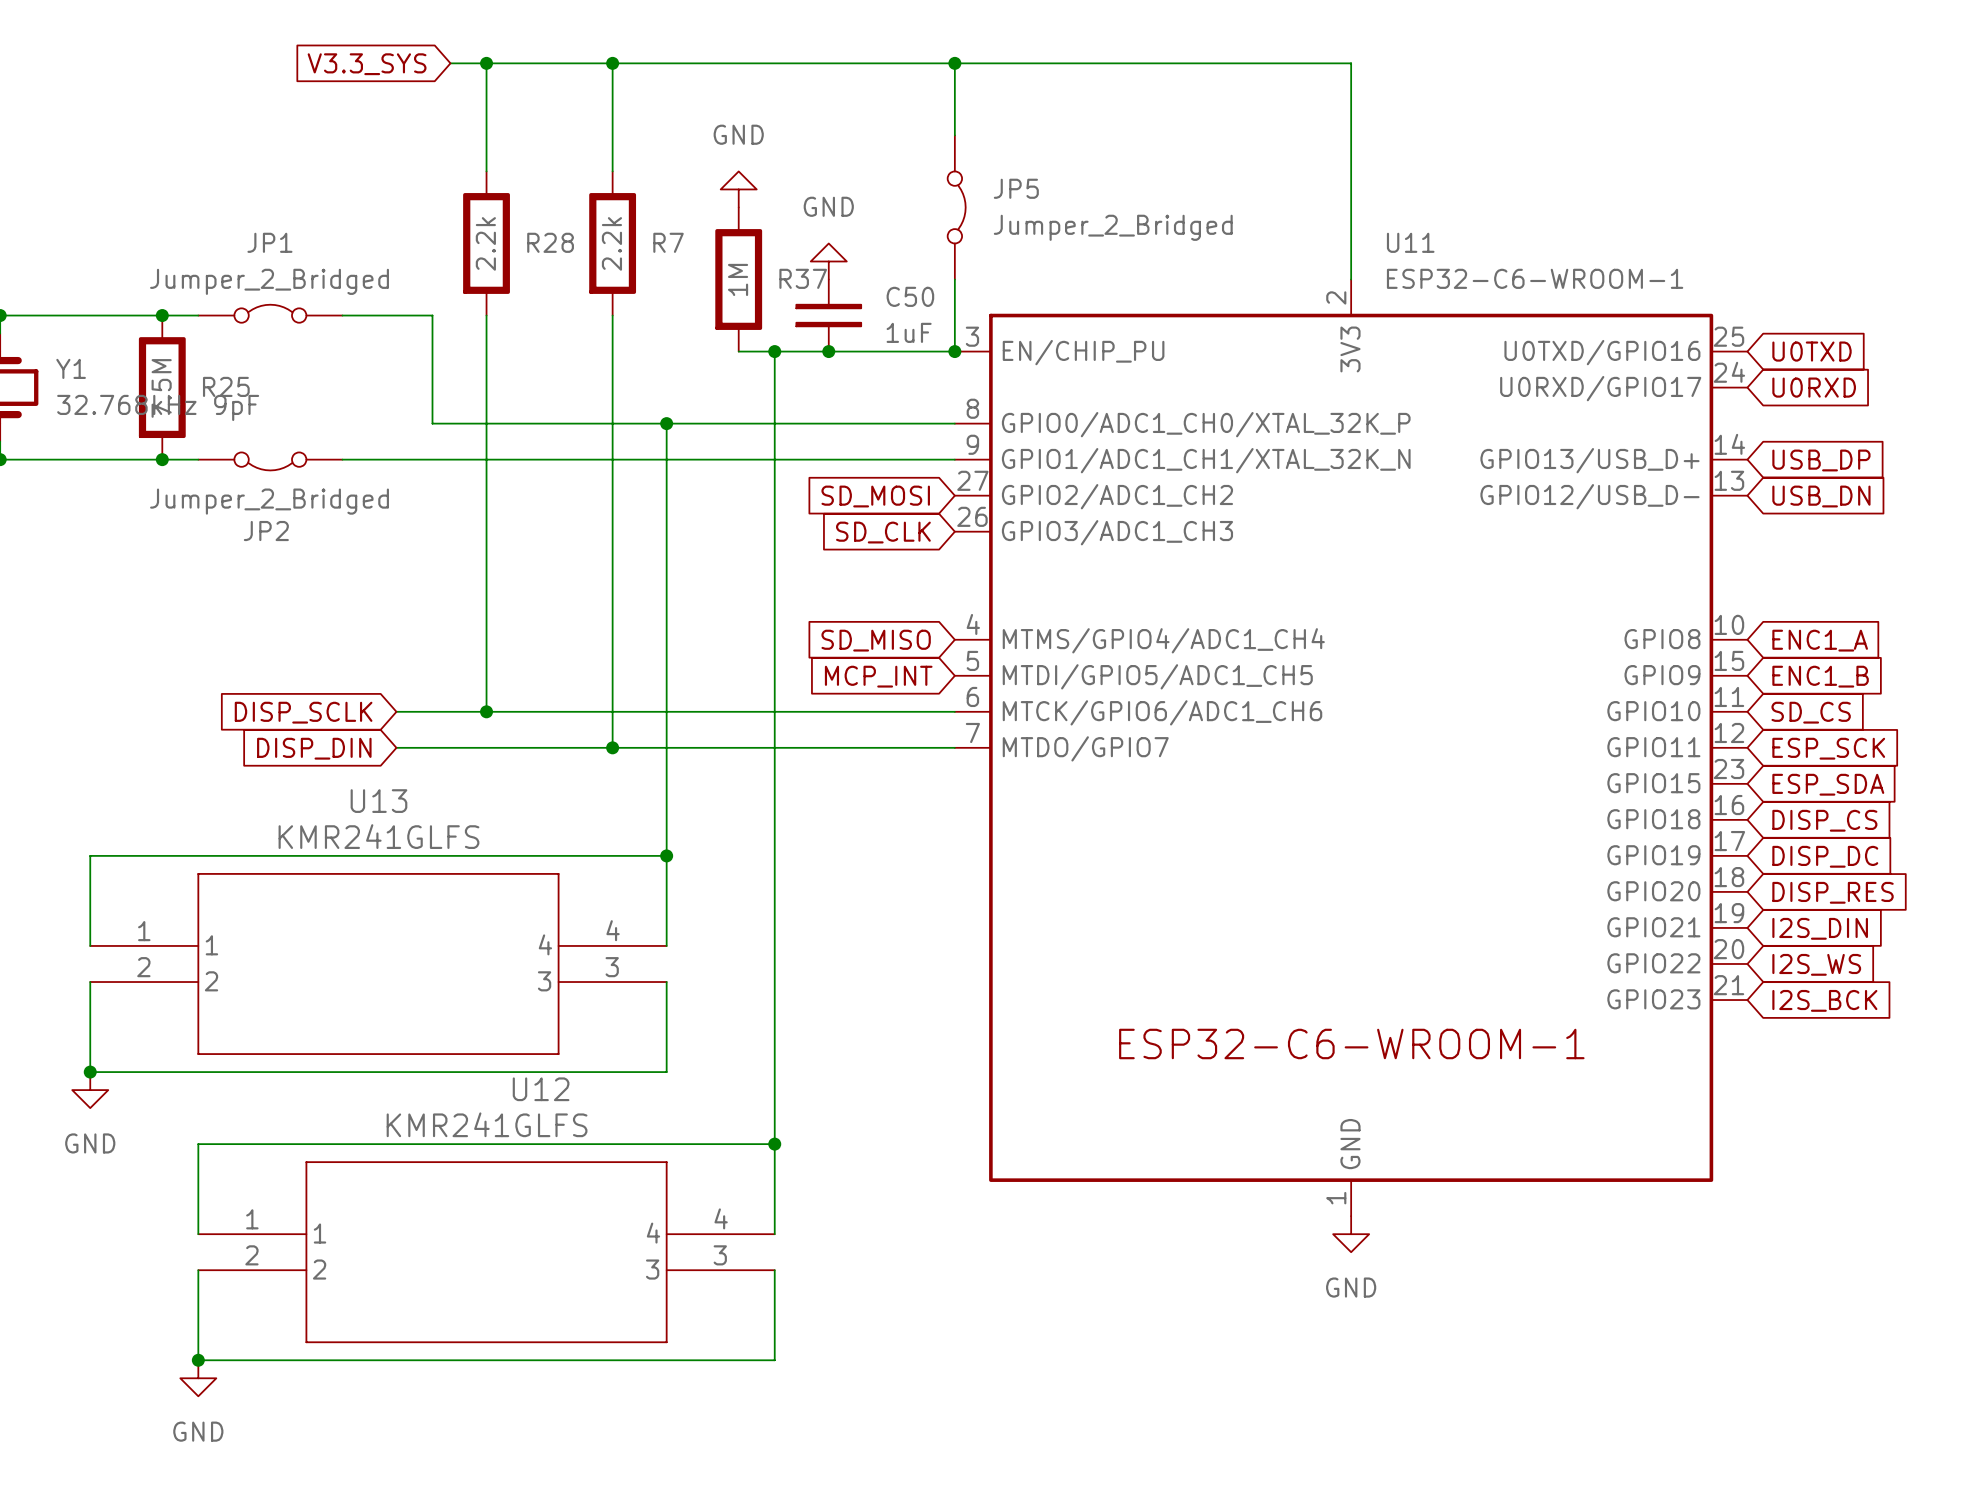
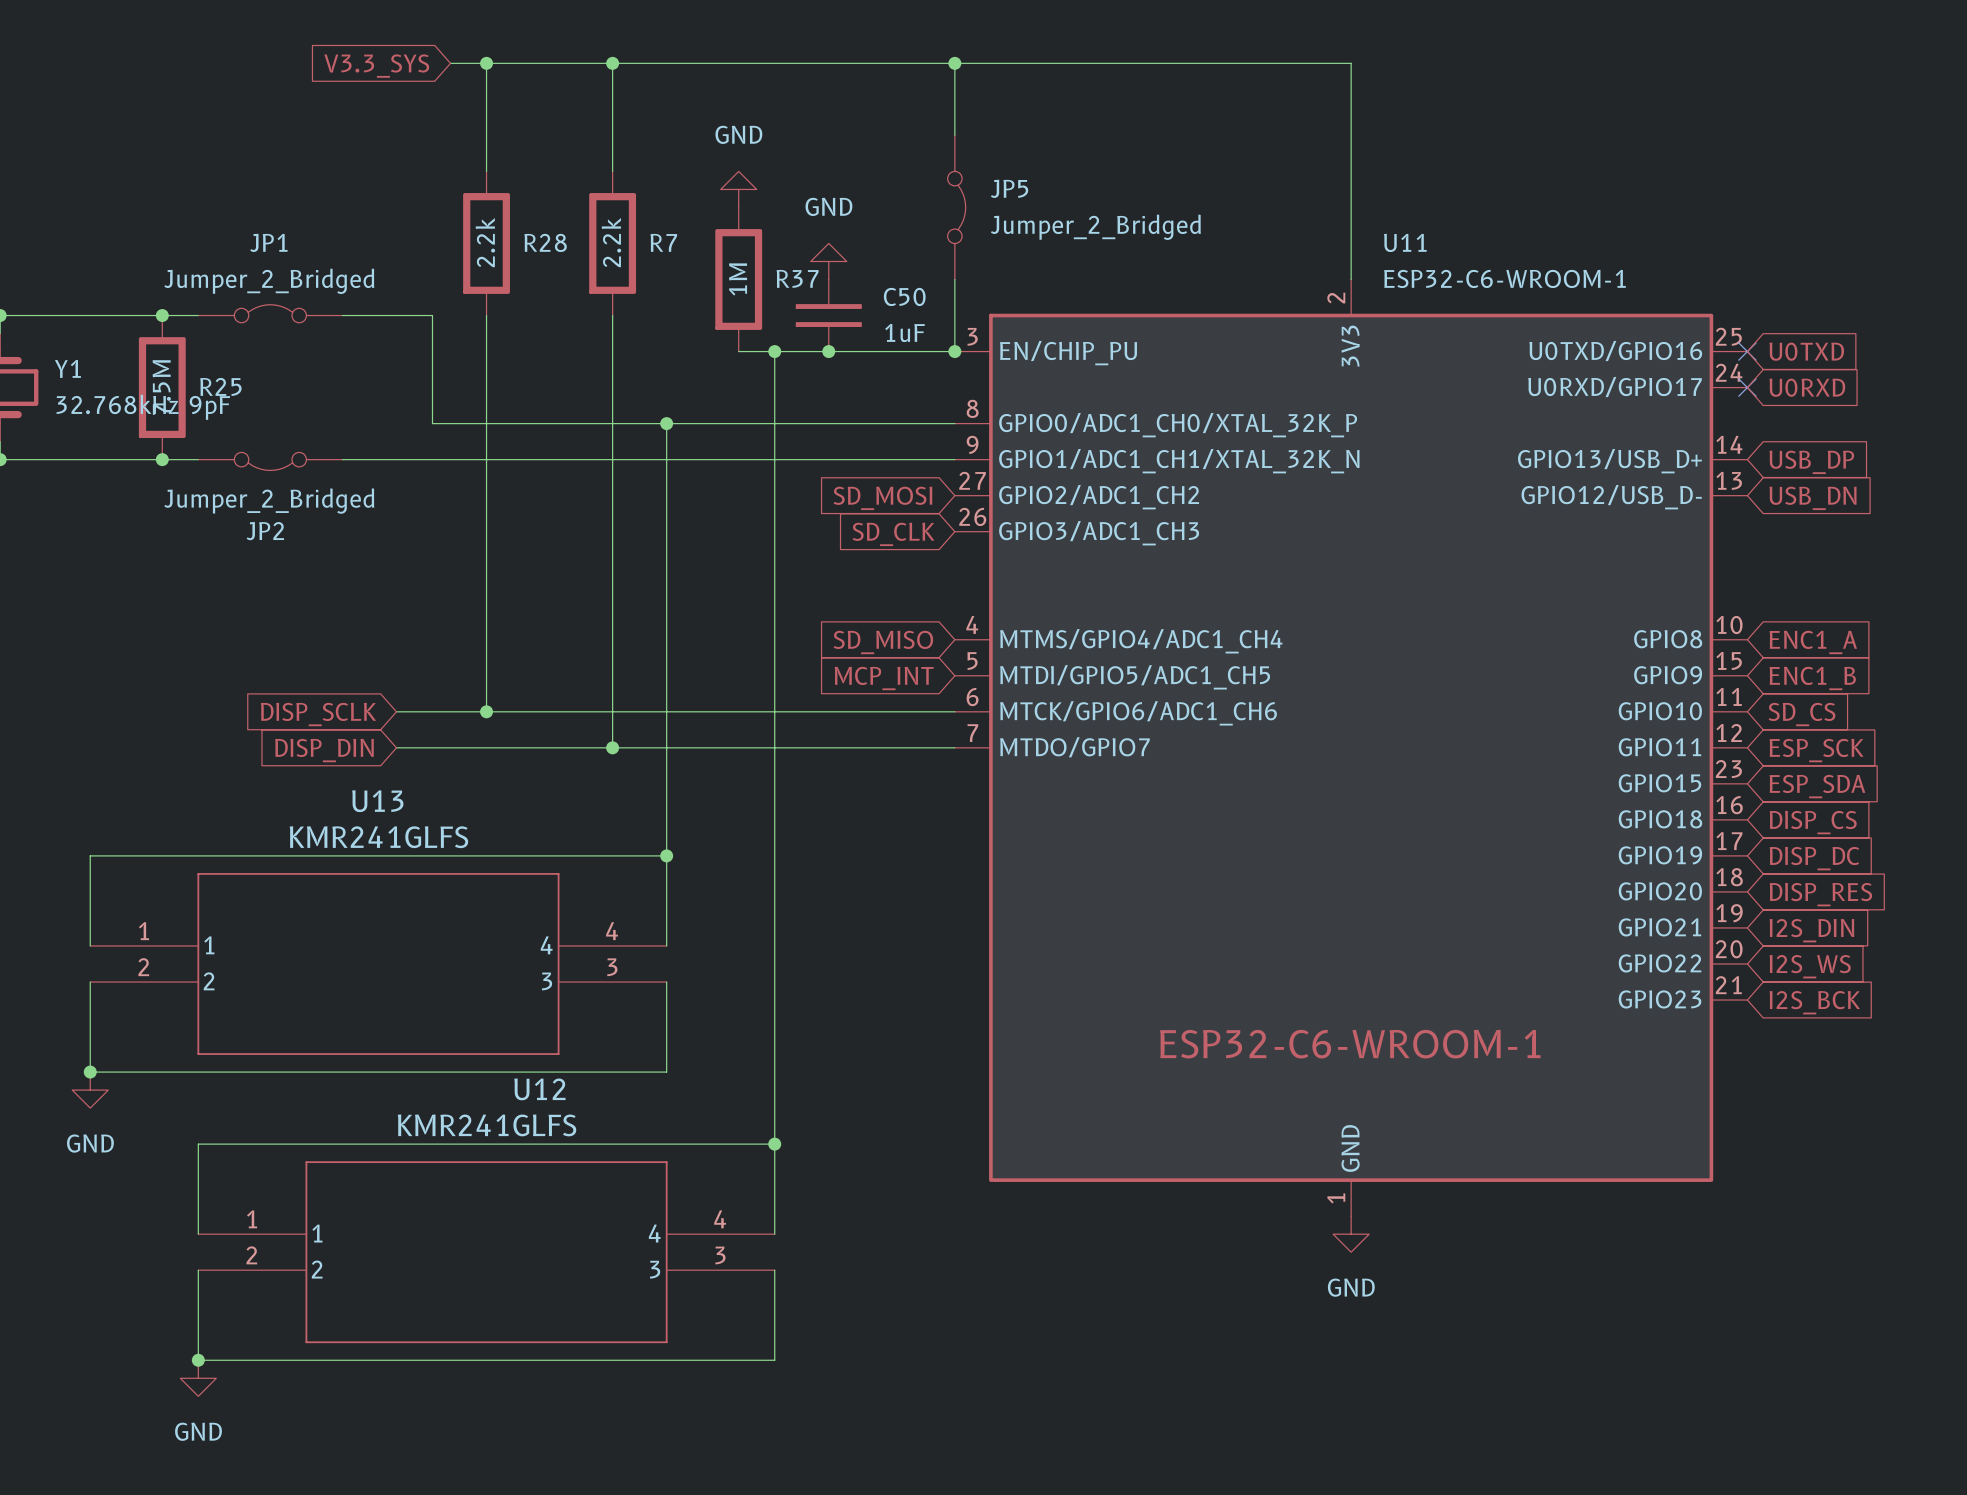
no-connect mark: none -> (1747, 351)
no-connect mark: none -> (1747, 387)

